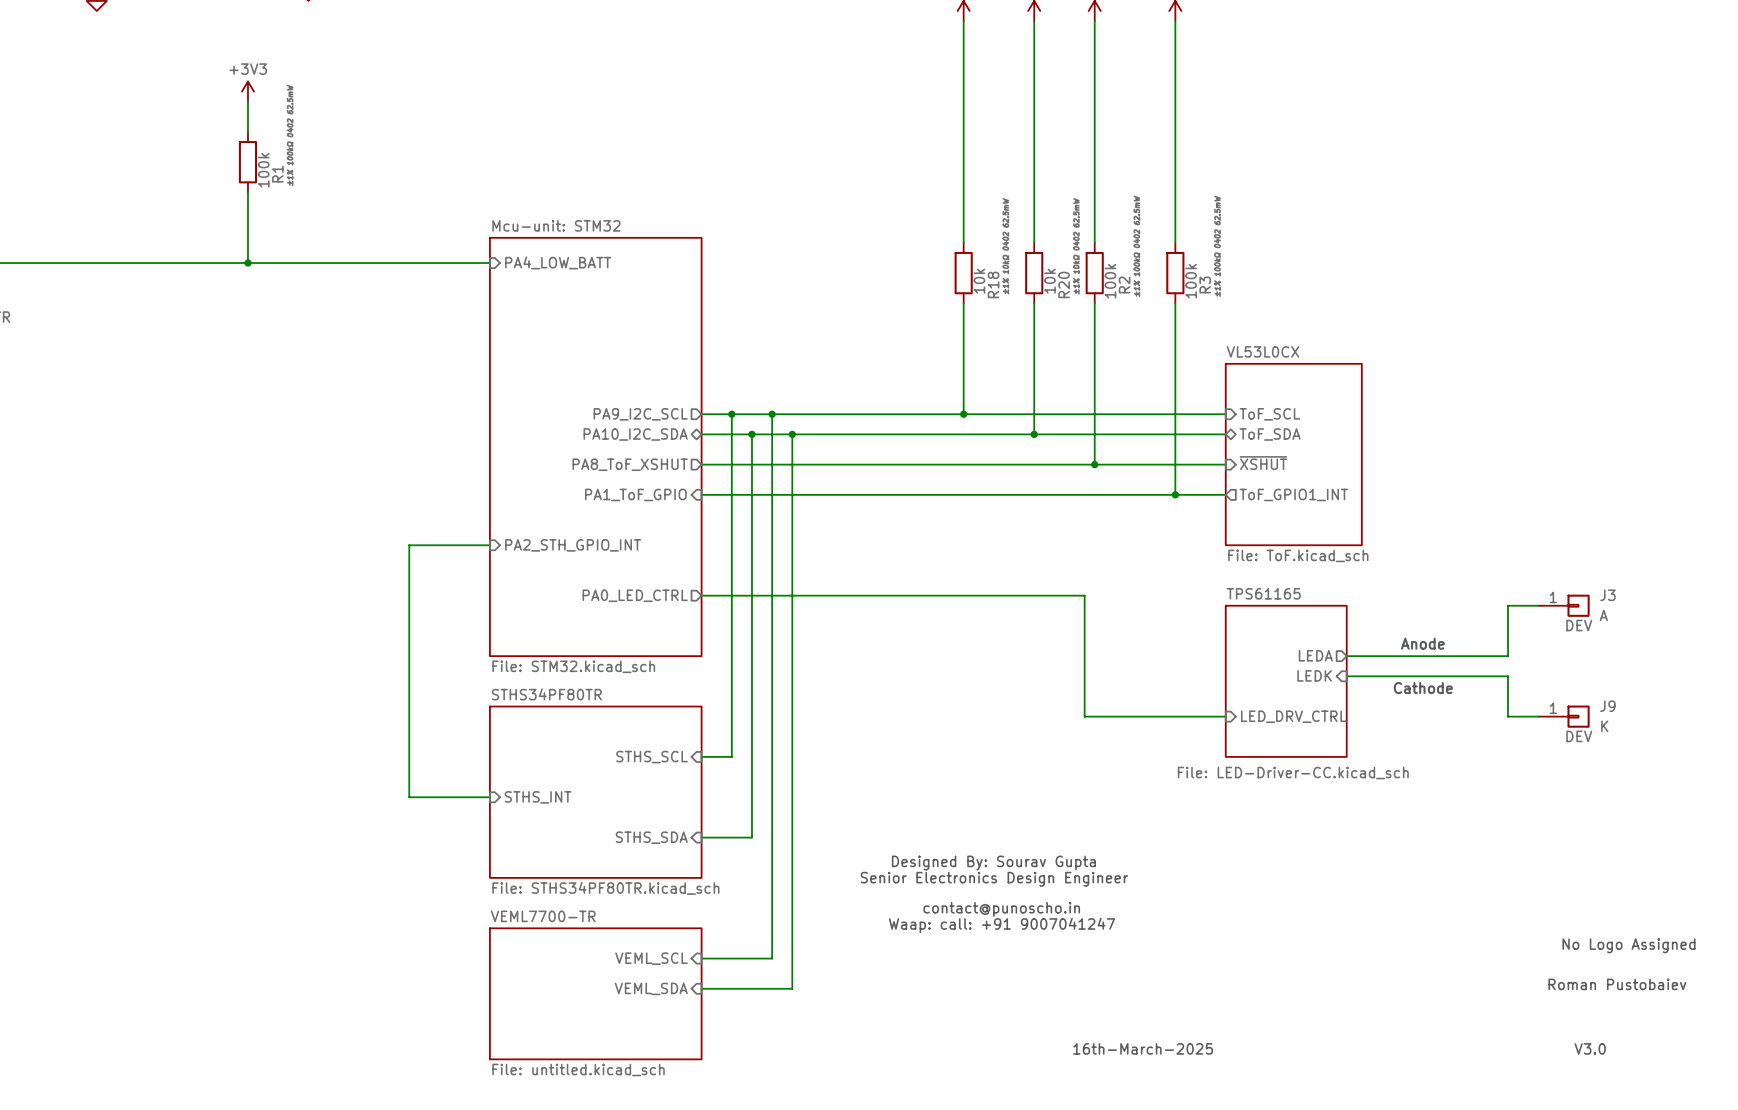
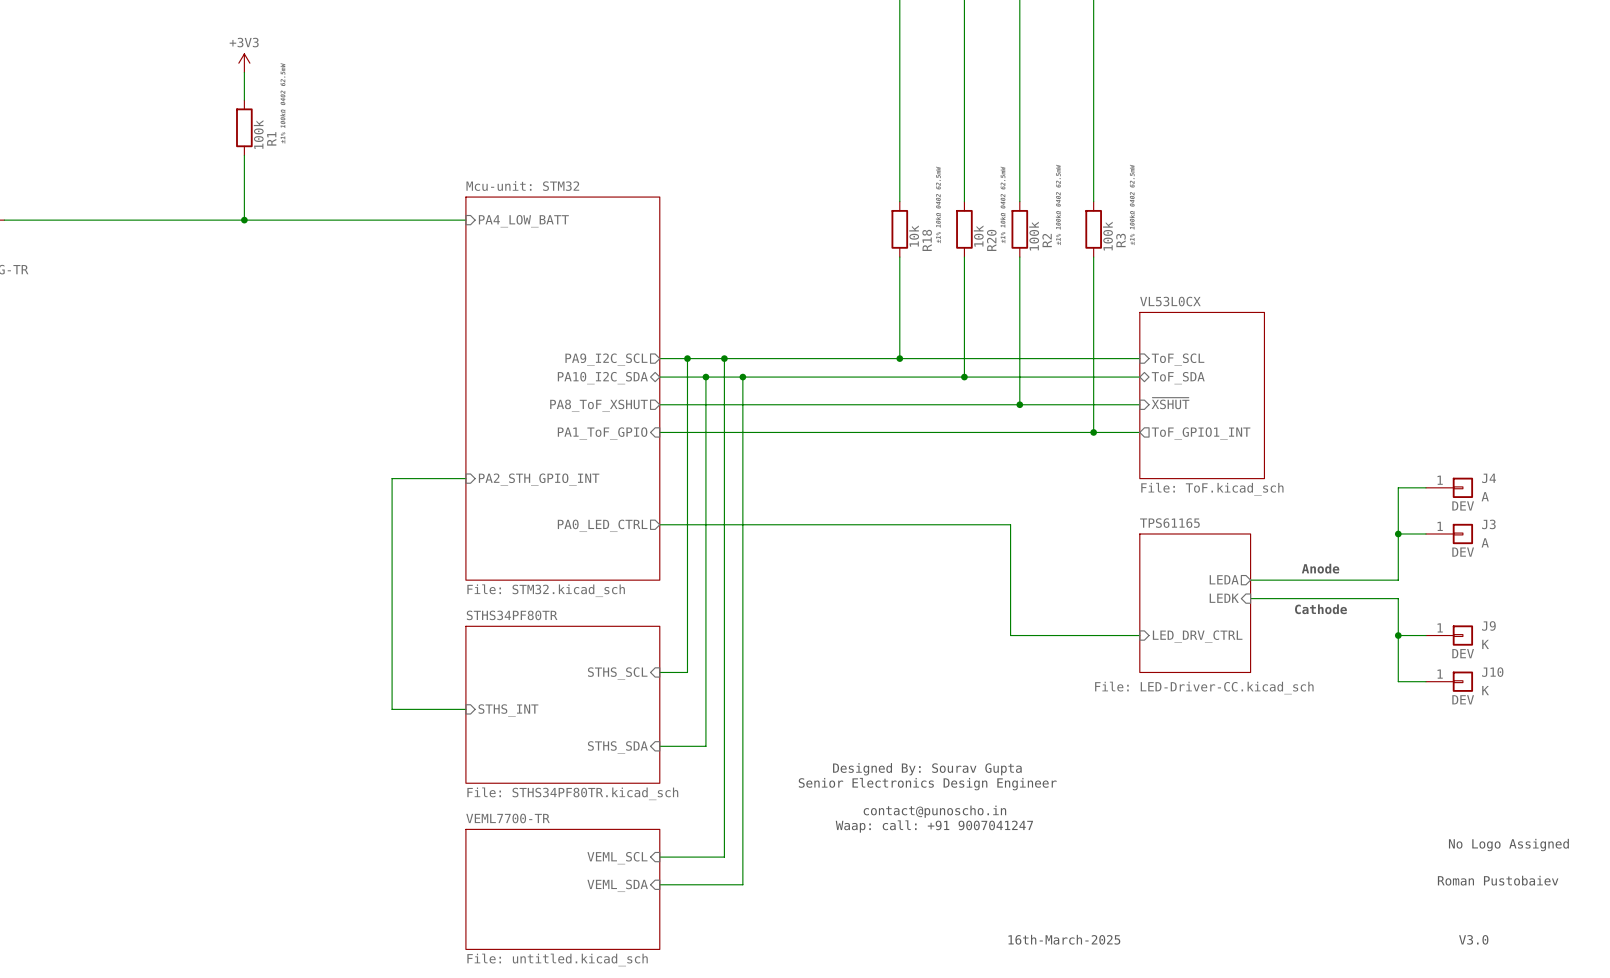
wire: none -> (1425, 487) (1398, 487) (1398, 533)
J4: none -> A (1449, 487)
junction: none -> (1398, 533)
wire: none -> (1398, 635) (1398, 681) (1425, 681)
junction: none -> (1398, 635)
J10: none -> K (1449, 681)

